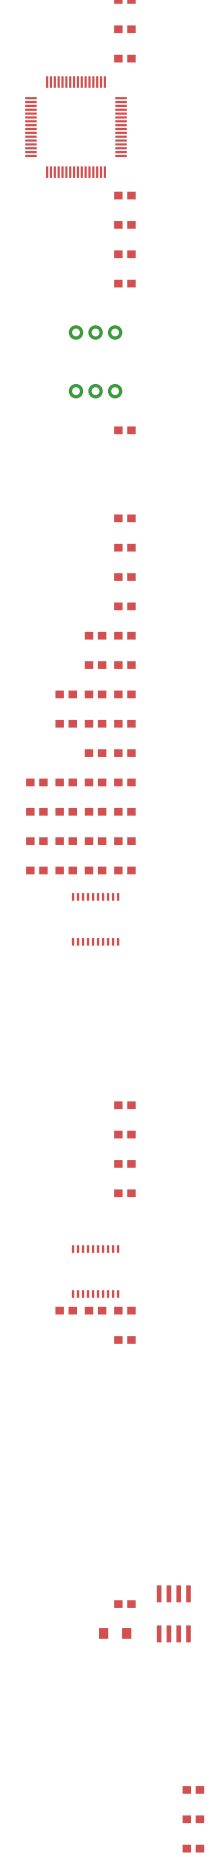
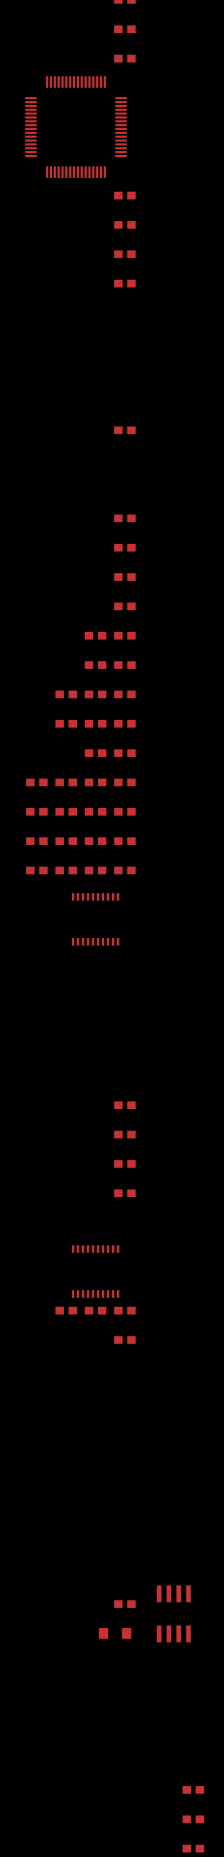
part: (95, 332) -> none
part: (95, 391) -> none

